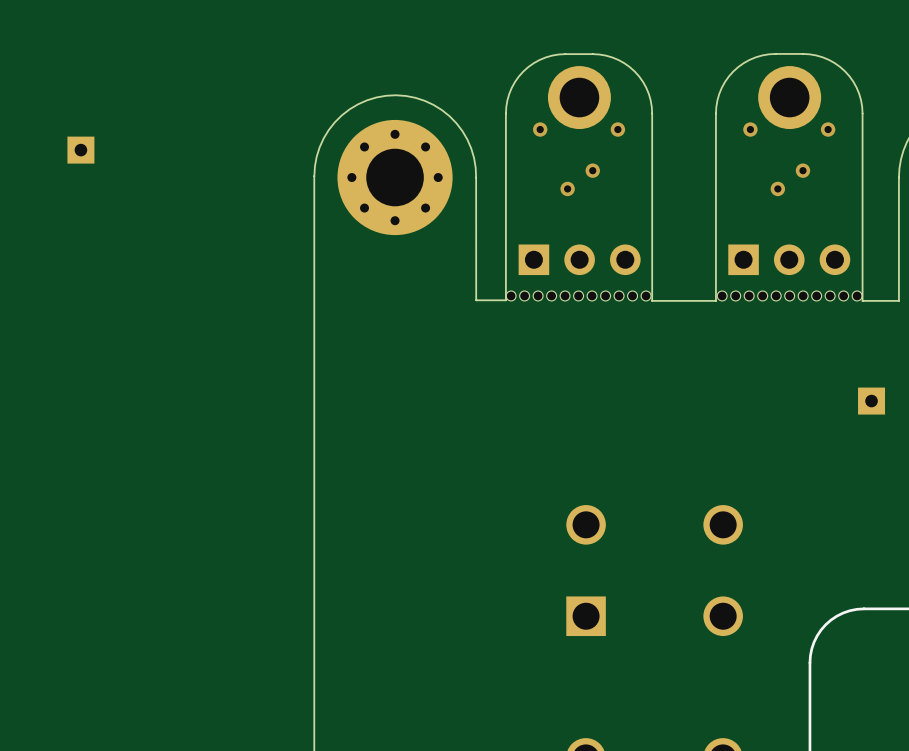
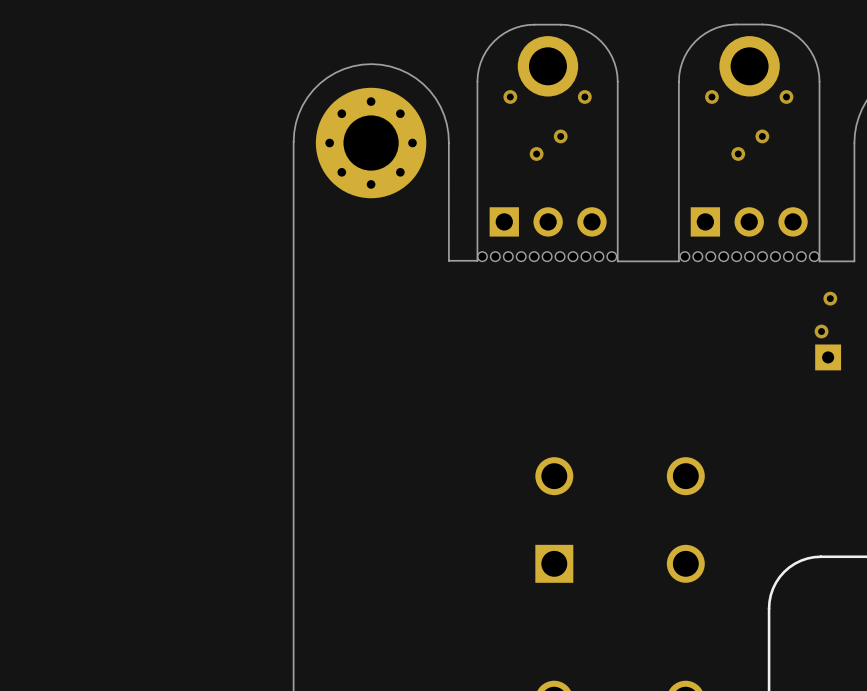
part: (80, 150) -> none
via: none -> (830, 298)
via: none -> (821, 331)

